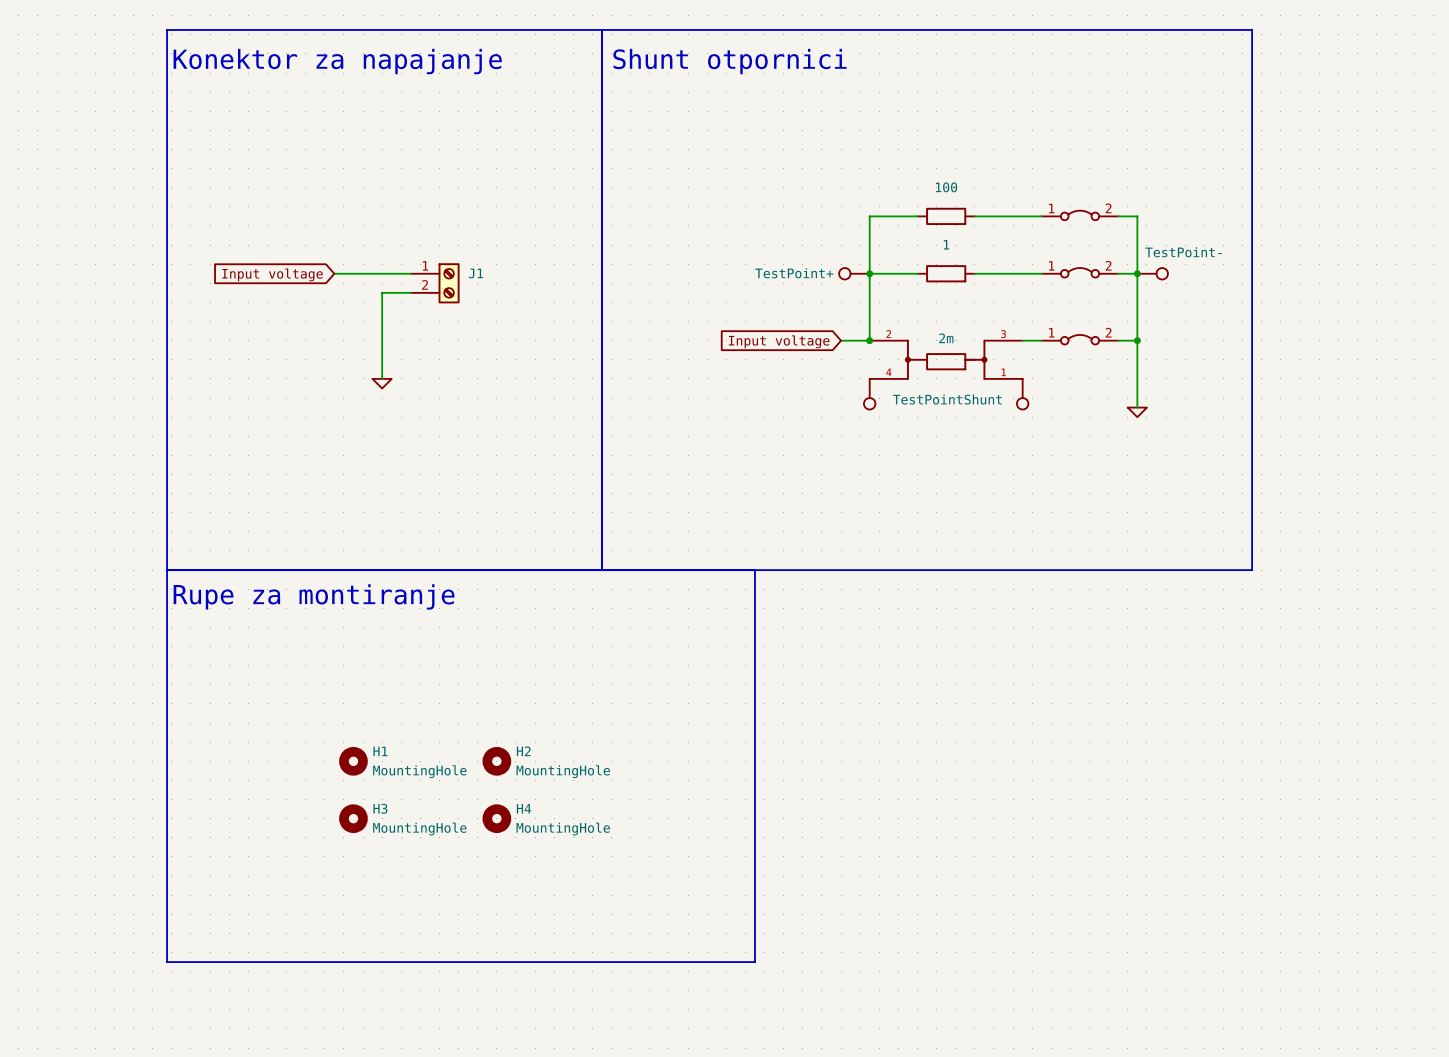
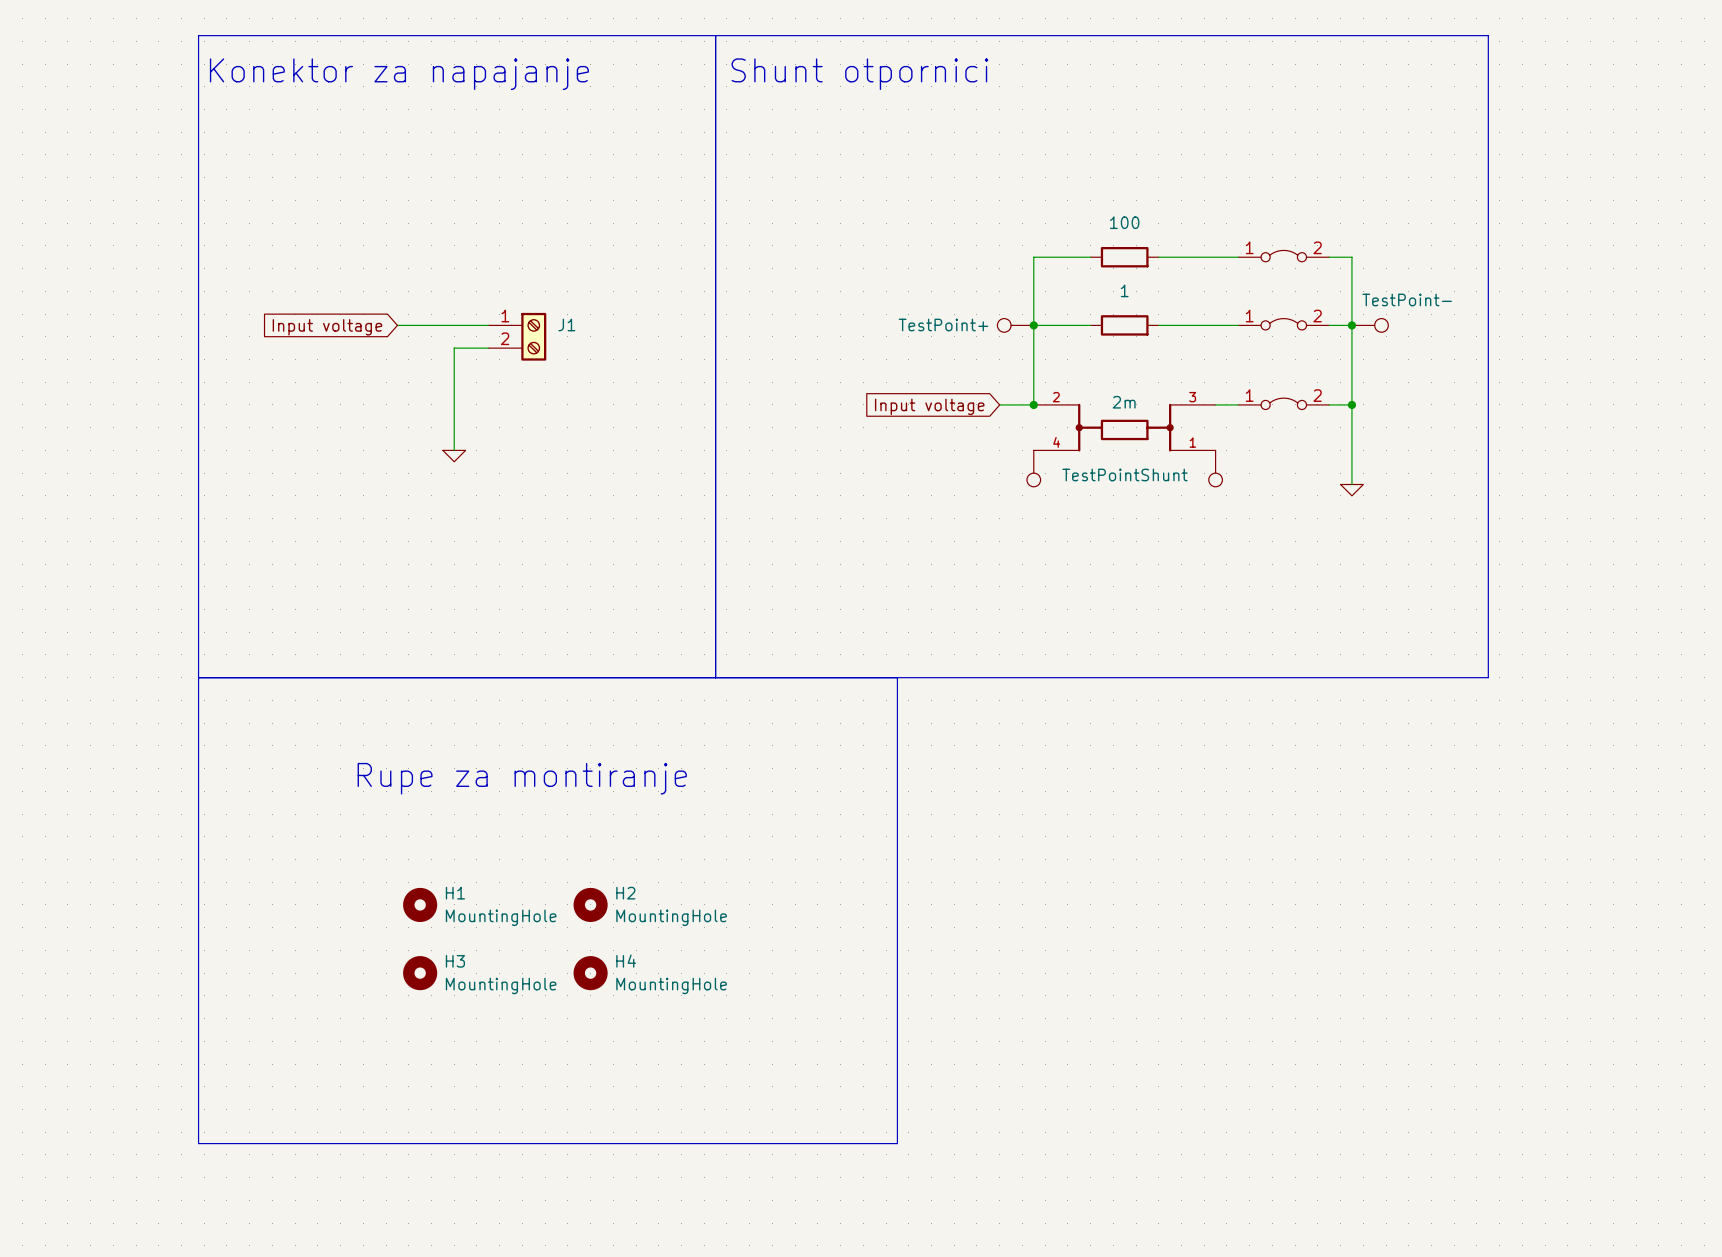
text position: Rupe za montiranje (314, 596) -> Rupe za montiranje (522, 778)

